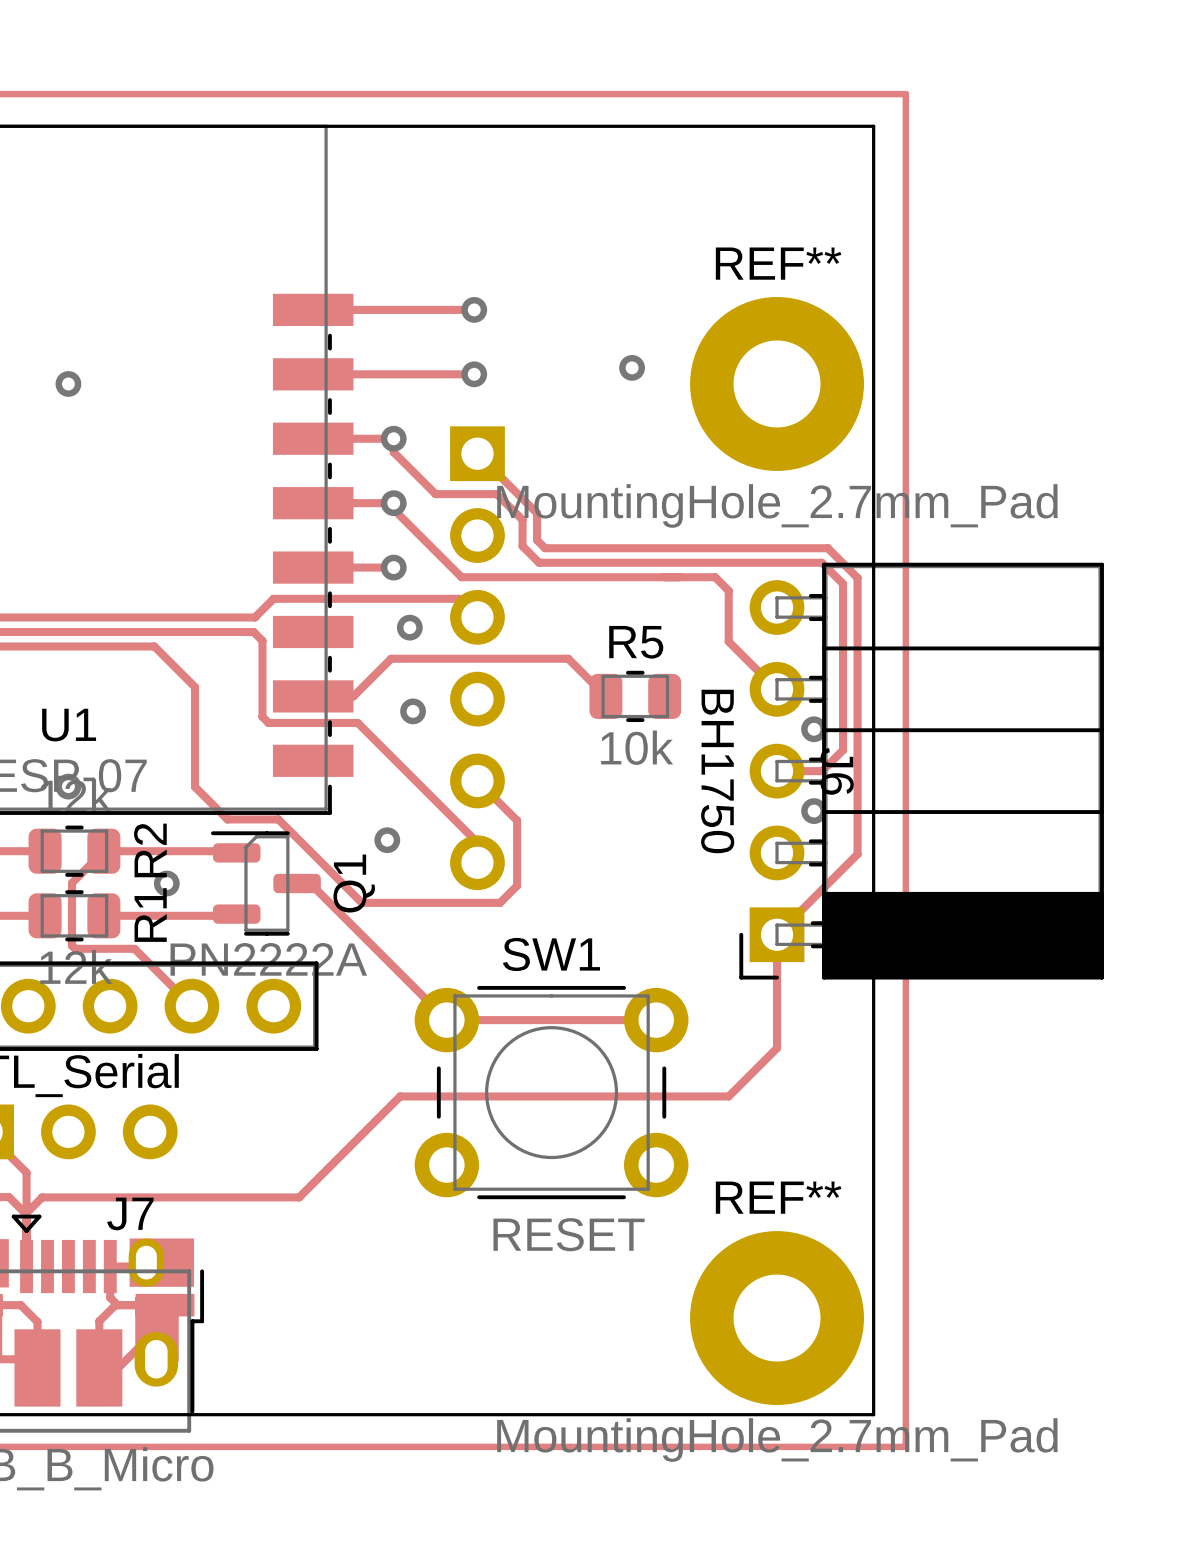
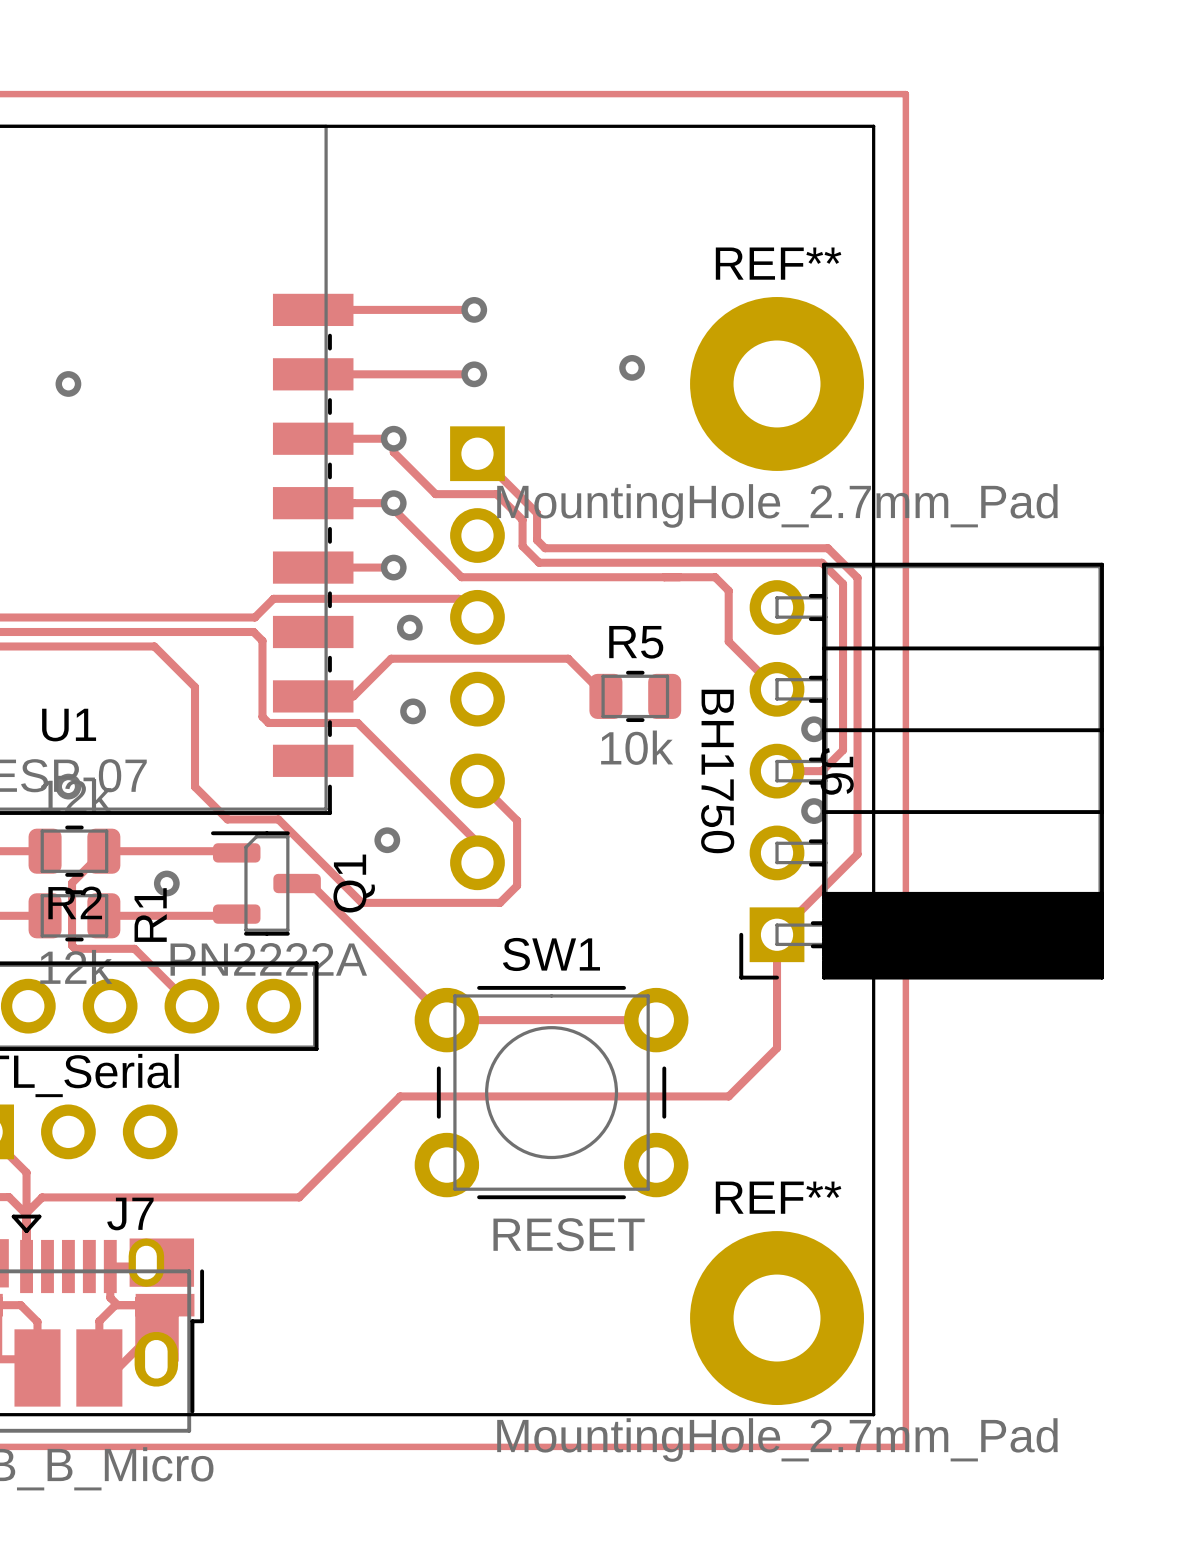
R2 name rotation: 0° (150, 850) -> 90° clockwise (75, 902)
R2 name position: R2 (150, 850) -> R2 (75, 902)

